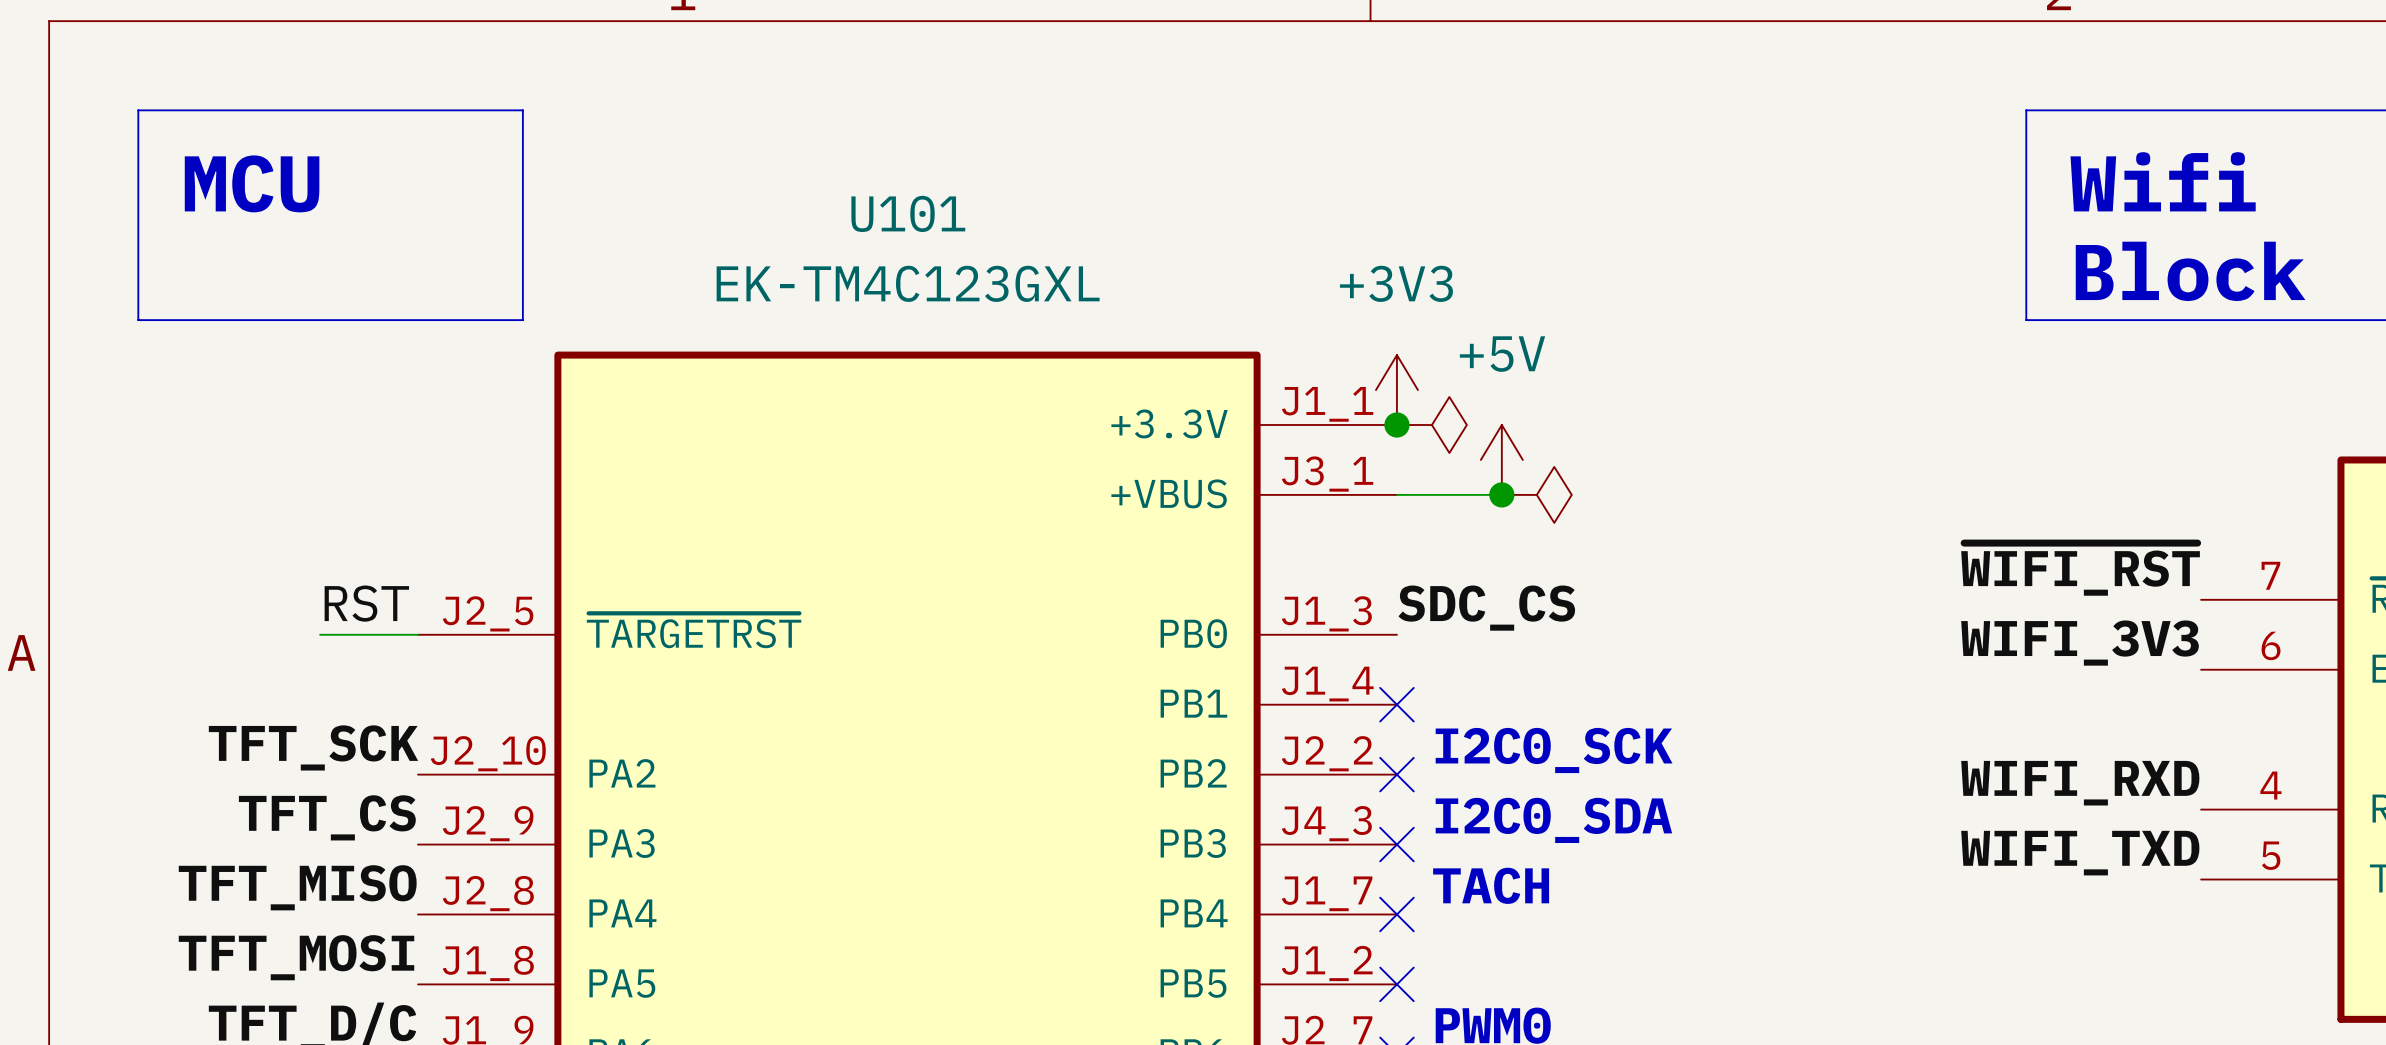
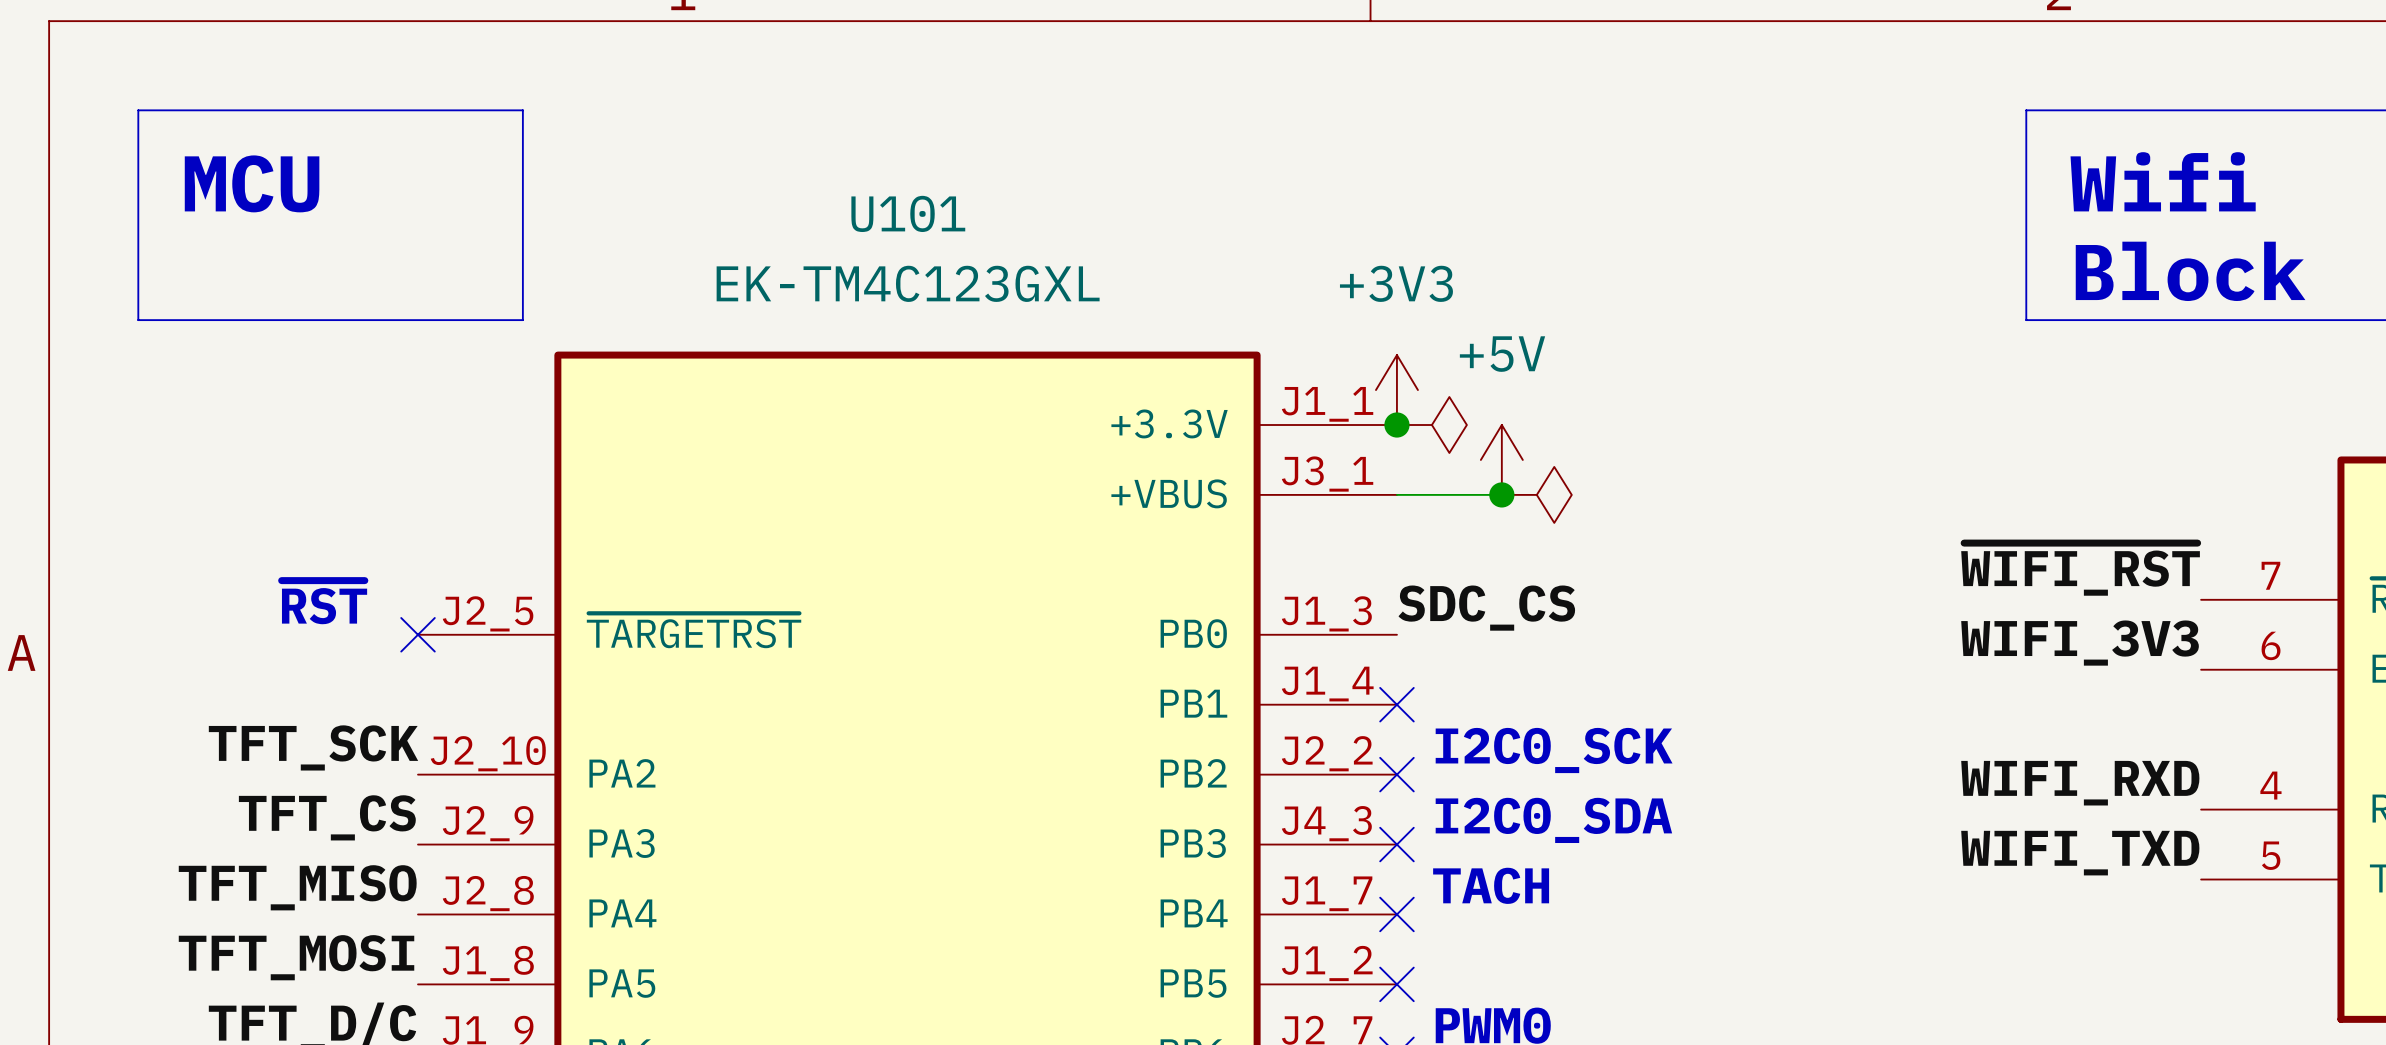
text: none -> ~{RST} (324, 602)
label: RST (366, 603) -> none
wire: (320, 634) (418, 634) -> none
no-connect mark: none -> (418, 634)

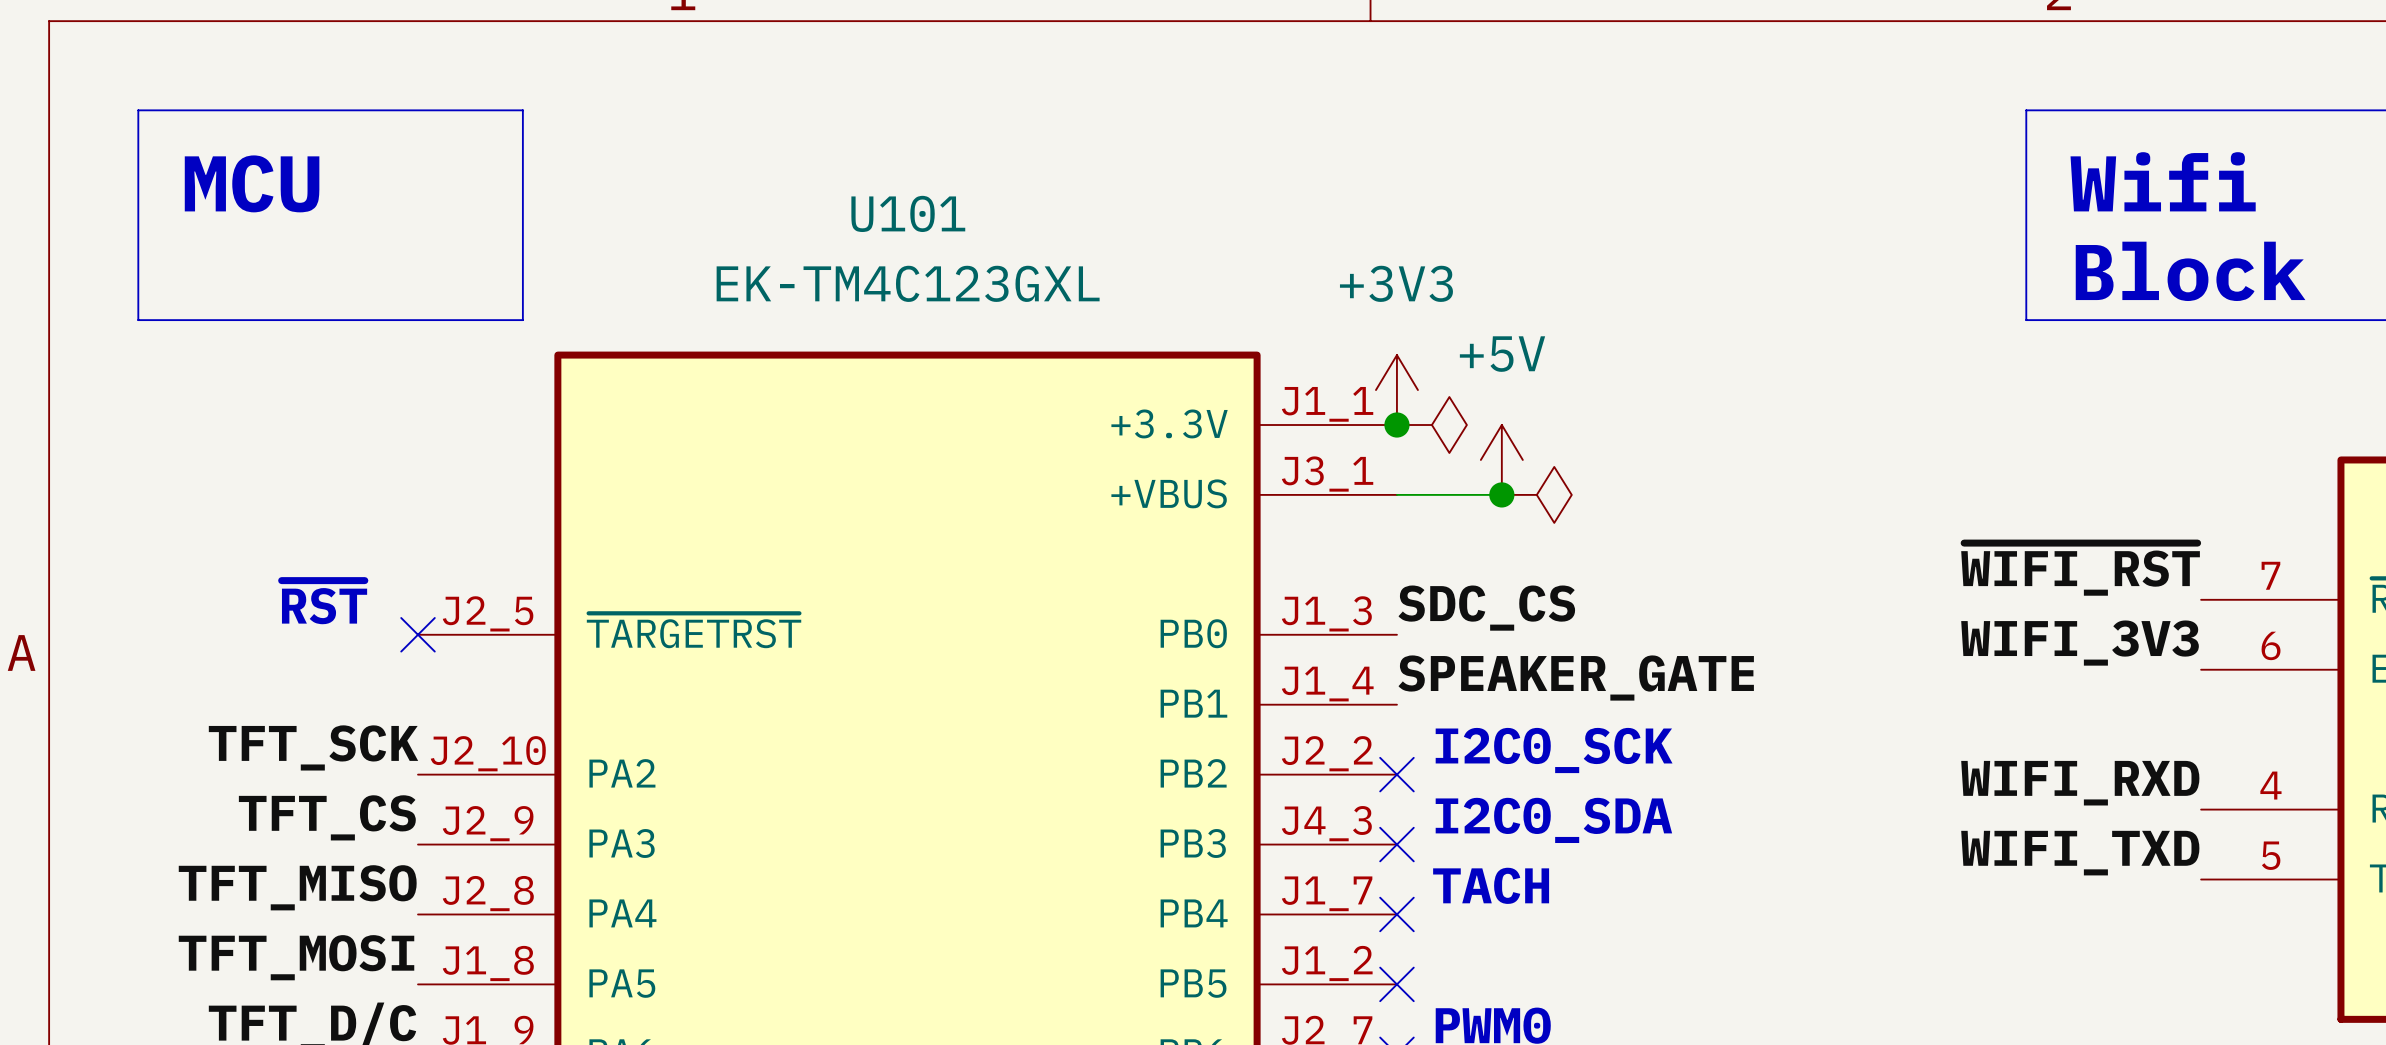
label: none -> SPEAKER_GATE (1576, 678)
no-connect mark: (1396, 704) -> none

